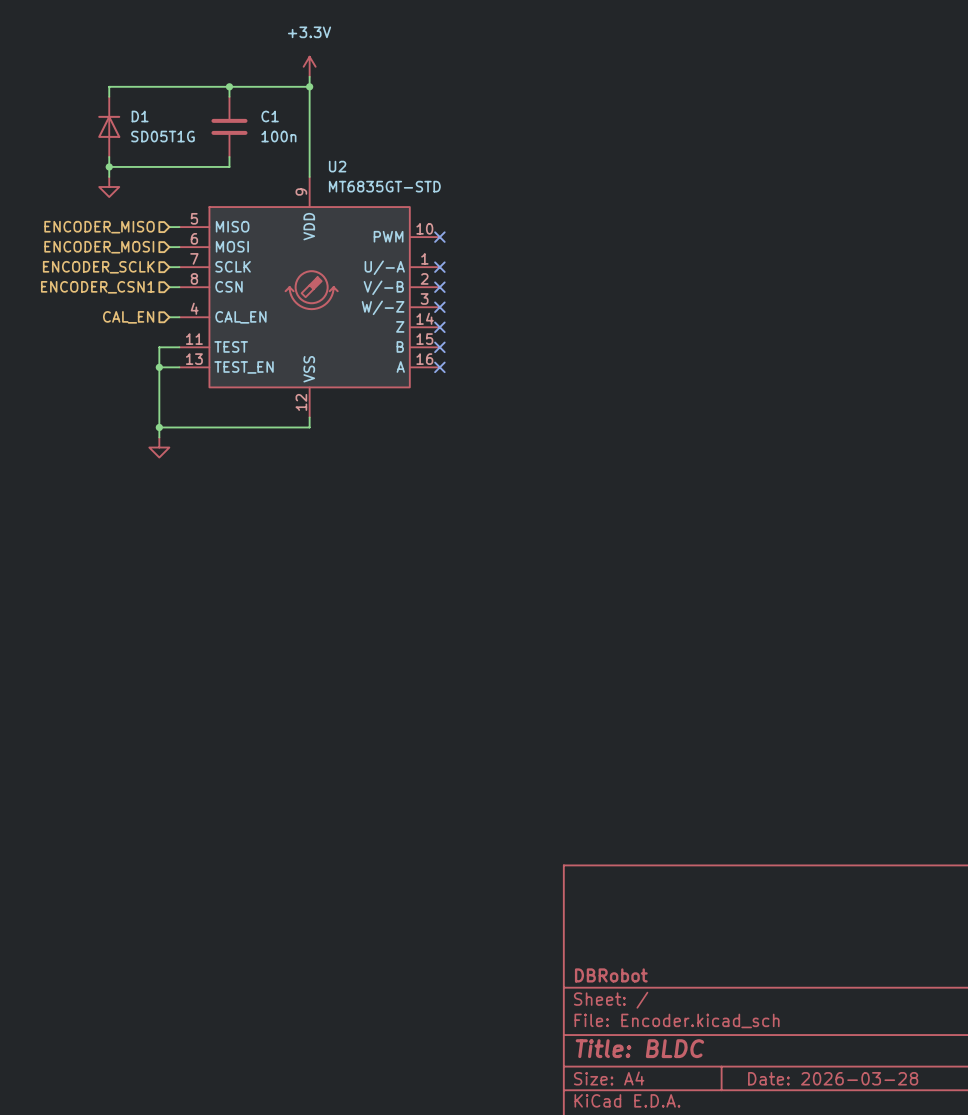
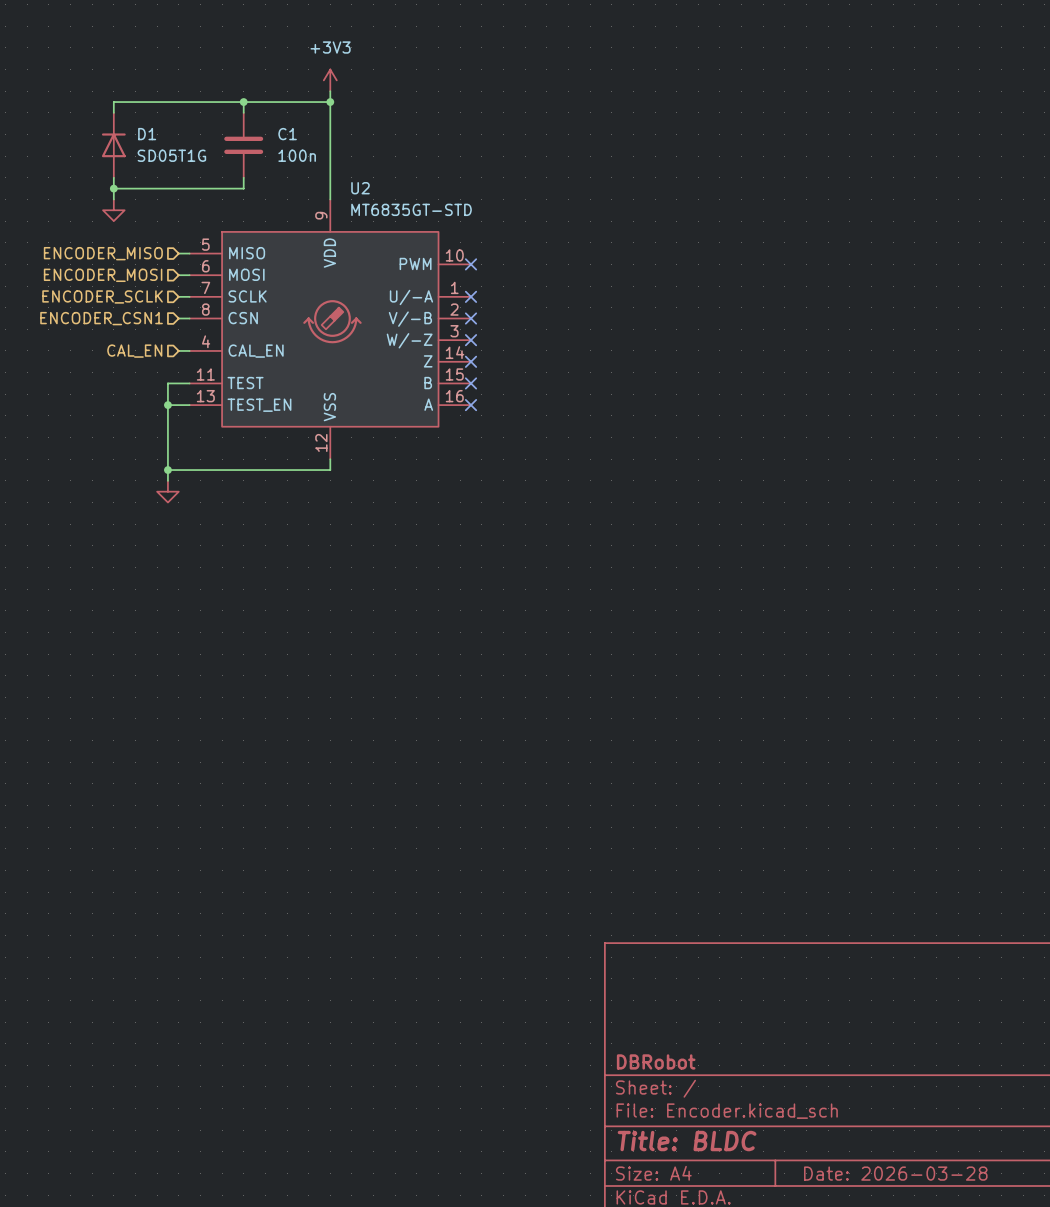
power symbol: +3.3V (309, 66) -> +3V3 (330, 80)

